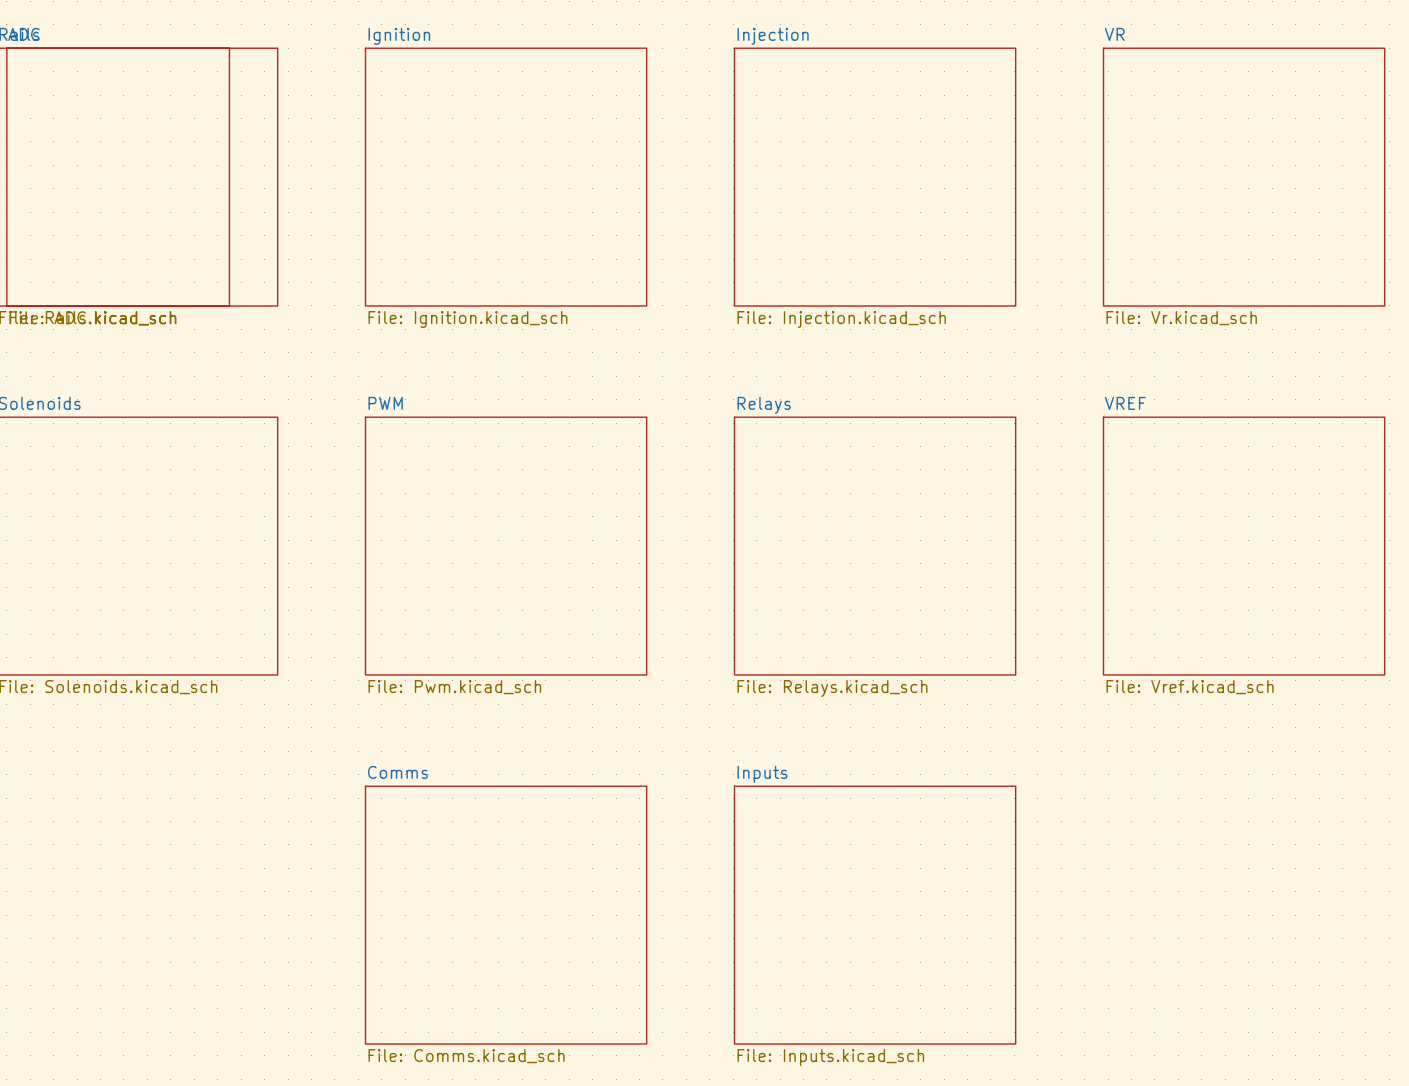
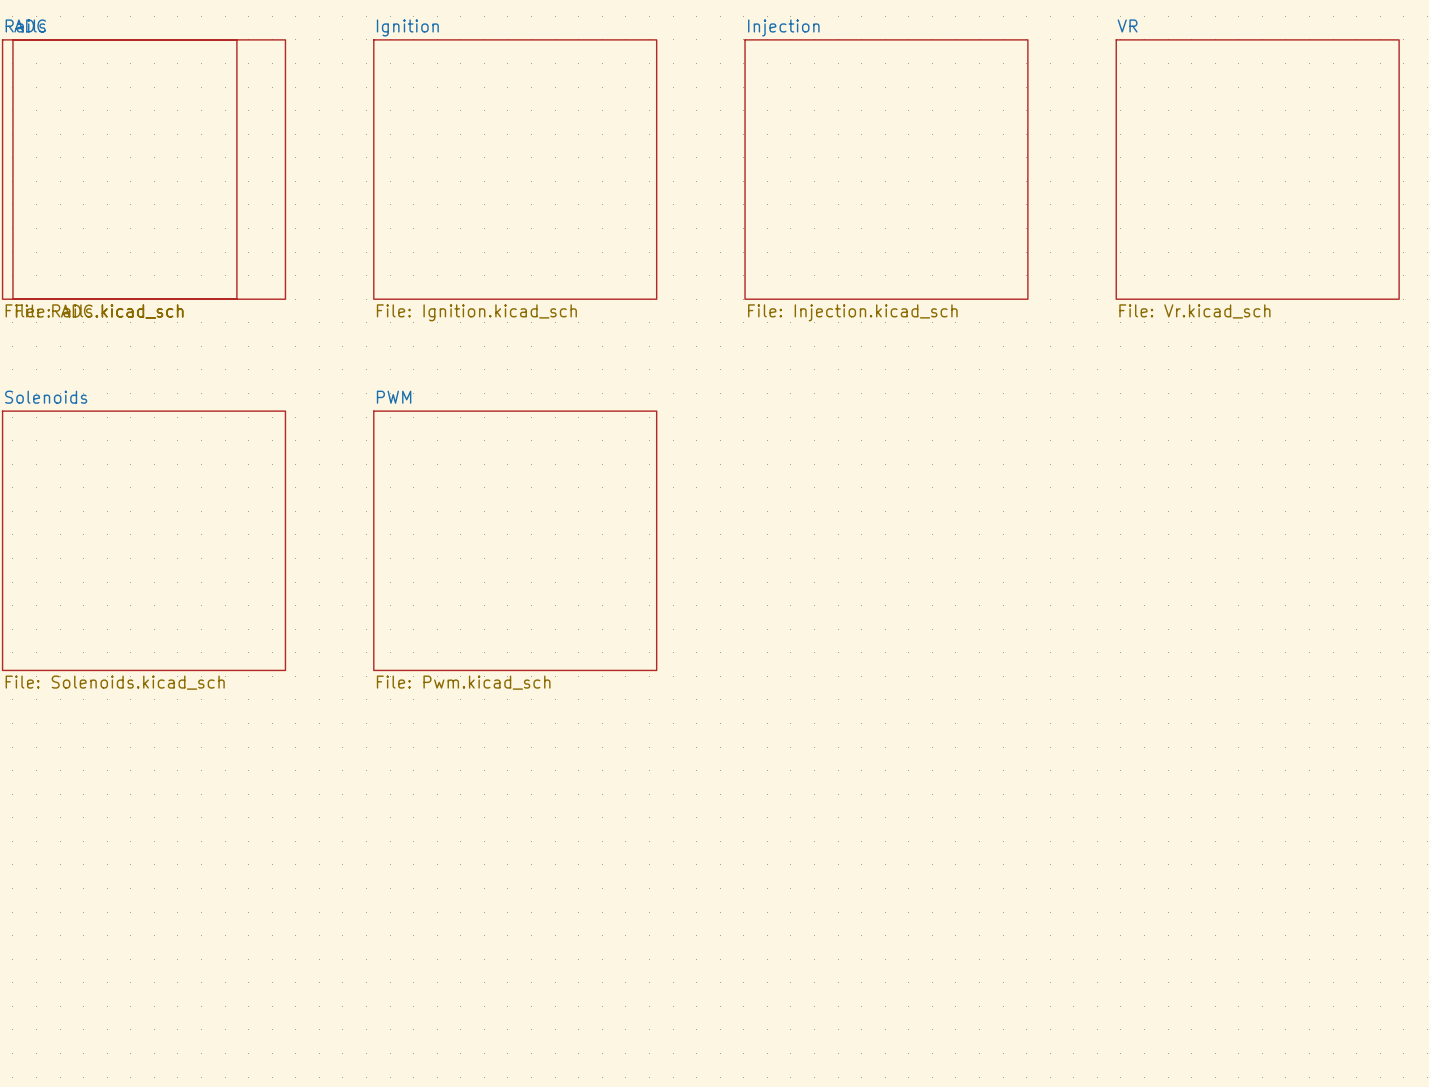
sheet Relays: File: Relays.kicad_sch (875, 546) -> none
sheet VREF: File: Vref.kicad_sch (1244, 546) -> none
sheet Comms: File: Comms.kicad_sch (506, 915) -> none
sheet Inputs: File: Inputs.kicad_sch (875, 915) -> none

